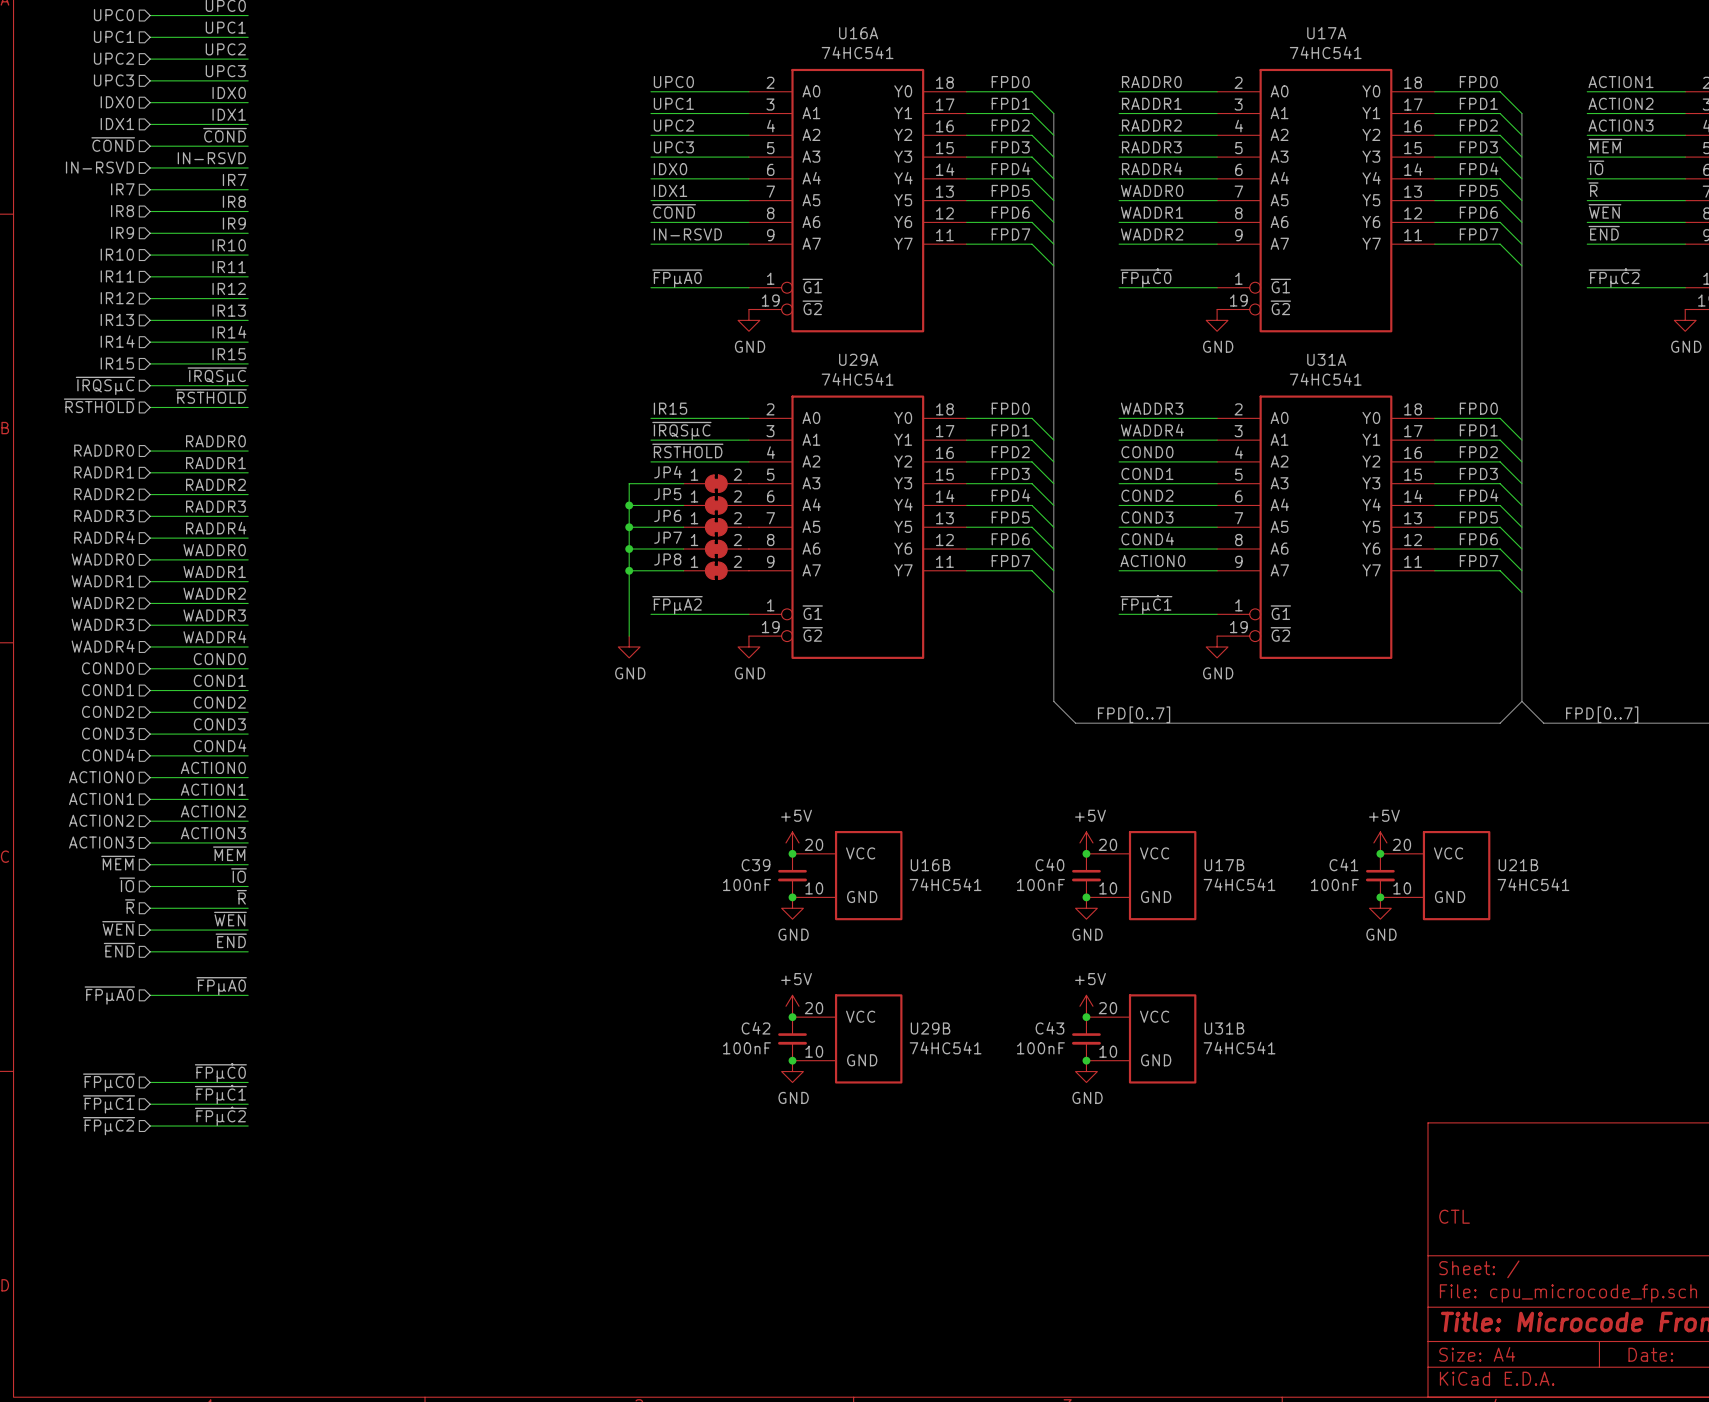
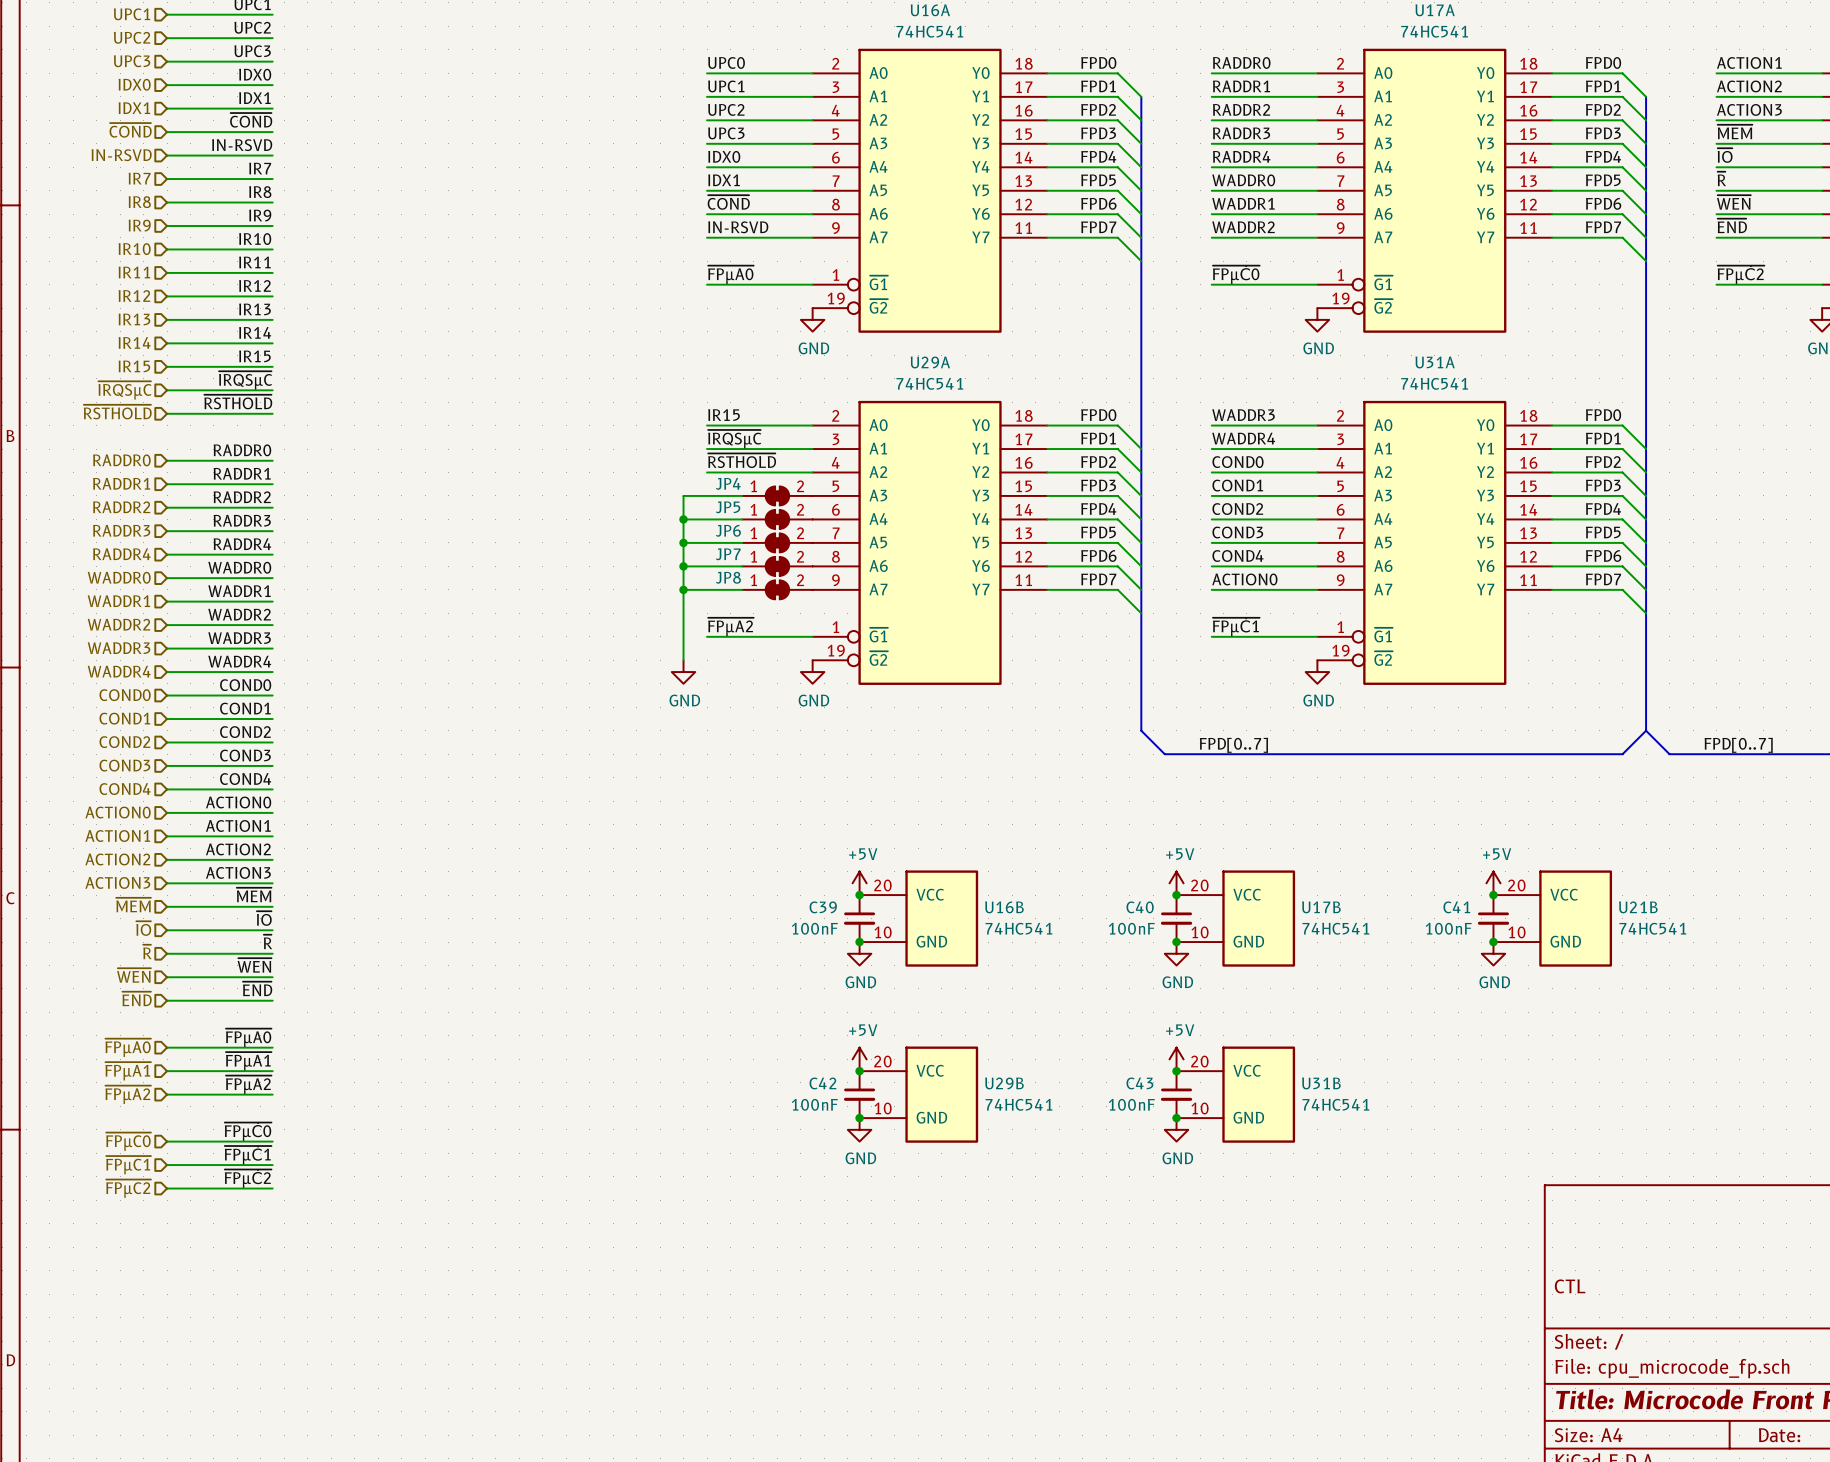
label: none -> ~{FPµA1} (248, 1061)
hierarchical label: none -> ~{FPµA1} (128, 1071)
wire: none -> (167, 1071) (272, 1071)
label: none -> ~{FPµA2} (248, 1084)
wire: none -> (167, 1094) (272, 1094)
hierarchical label: none -> ~{FPµA2} (128, 1094)

